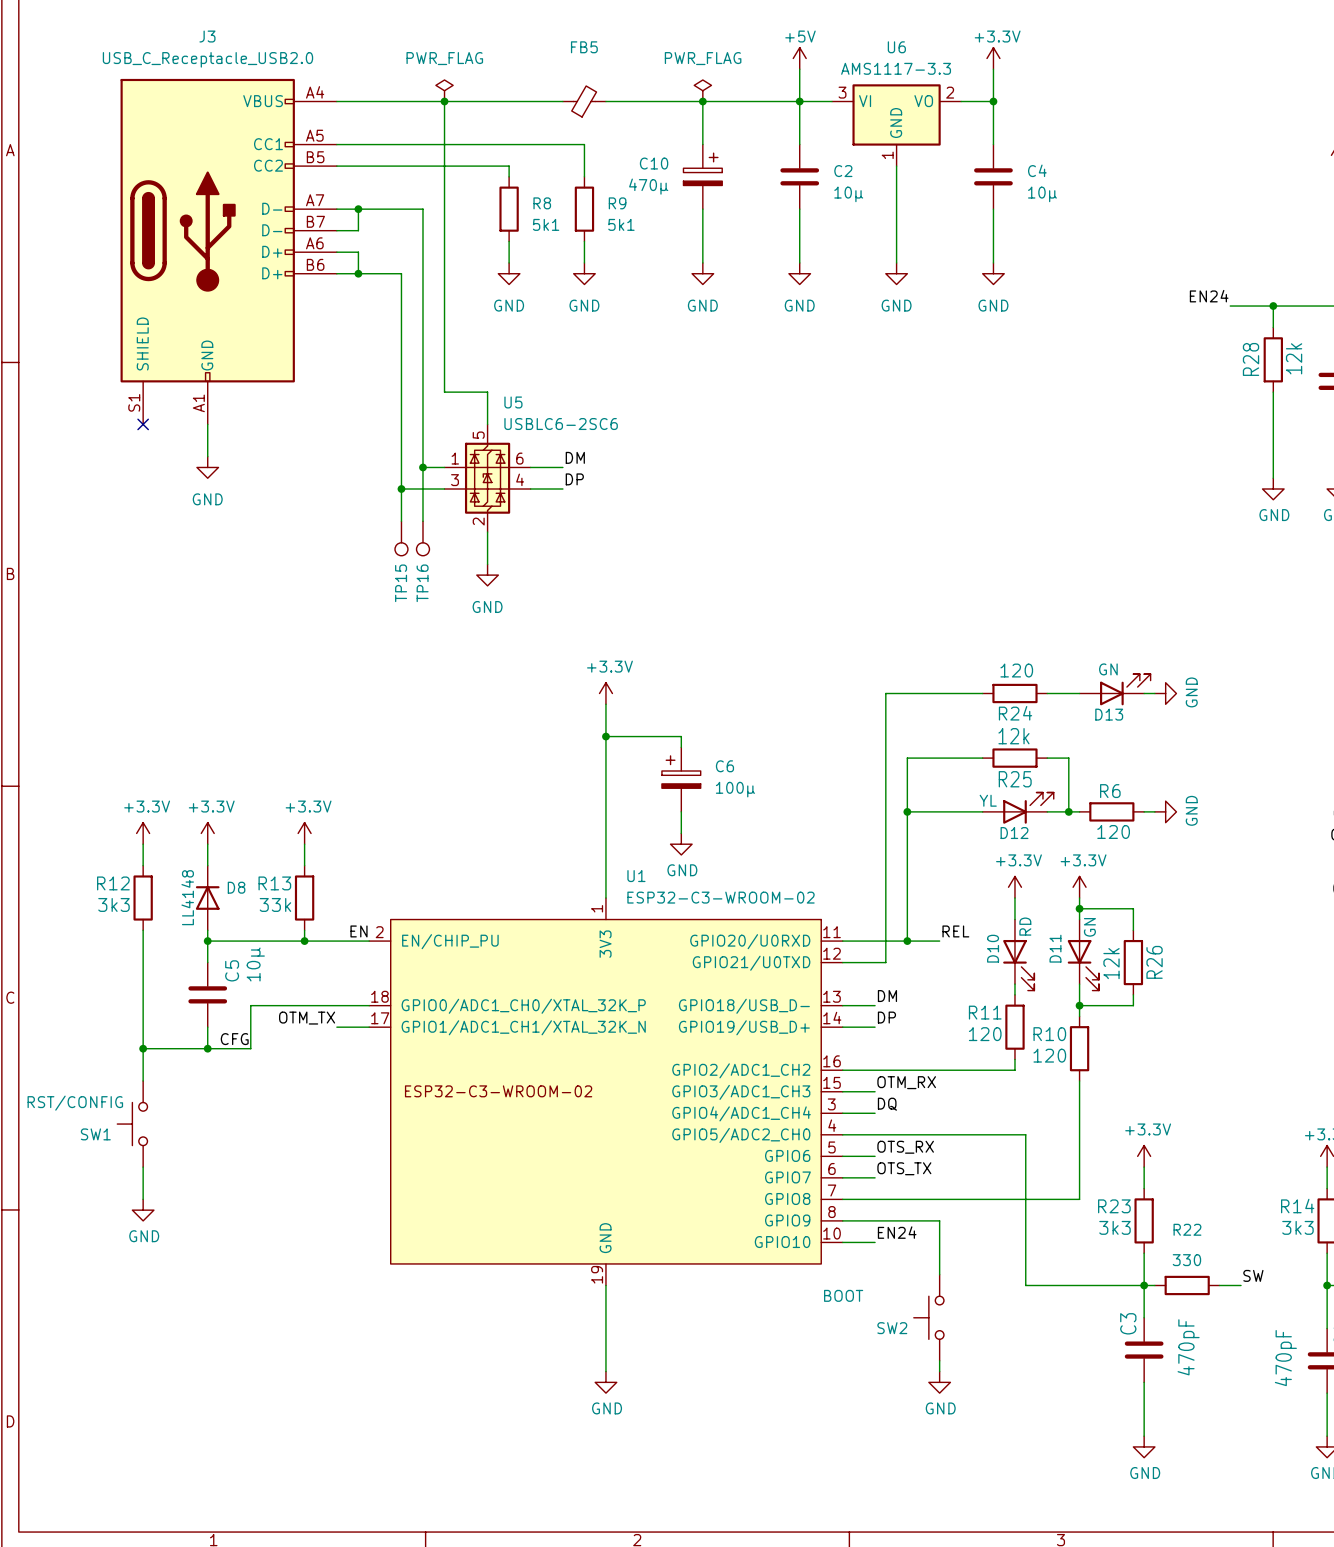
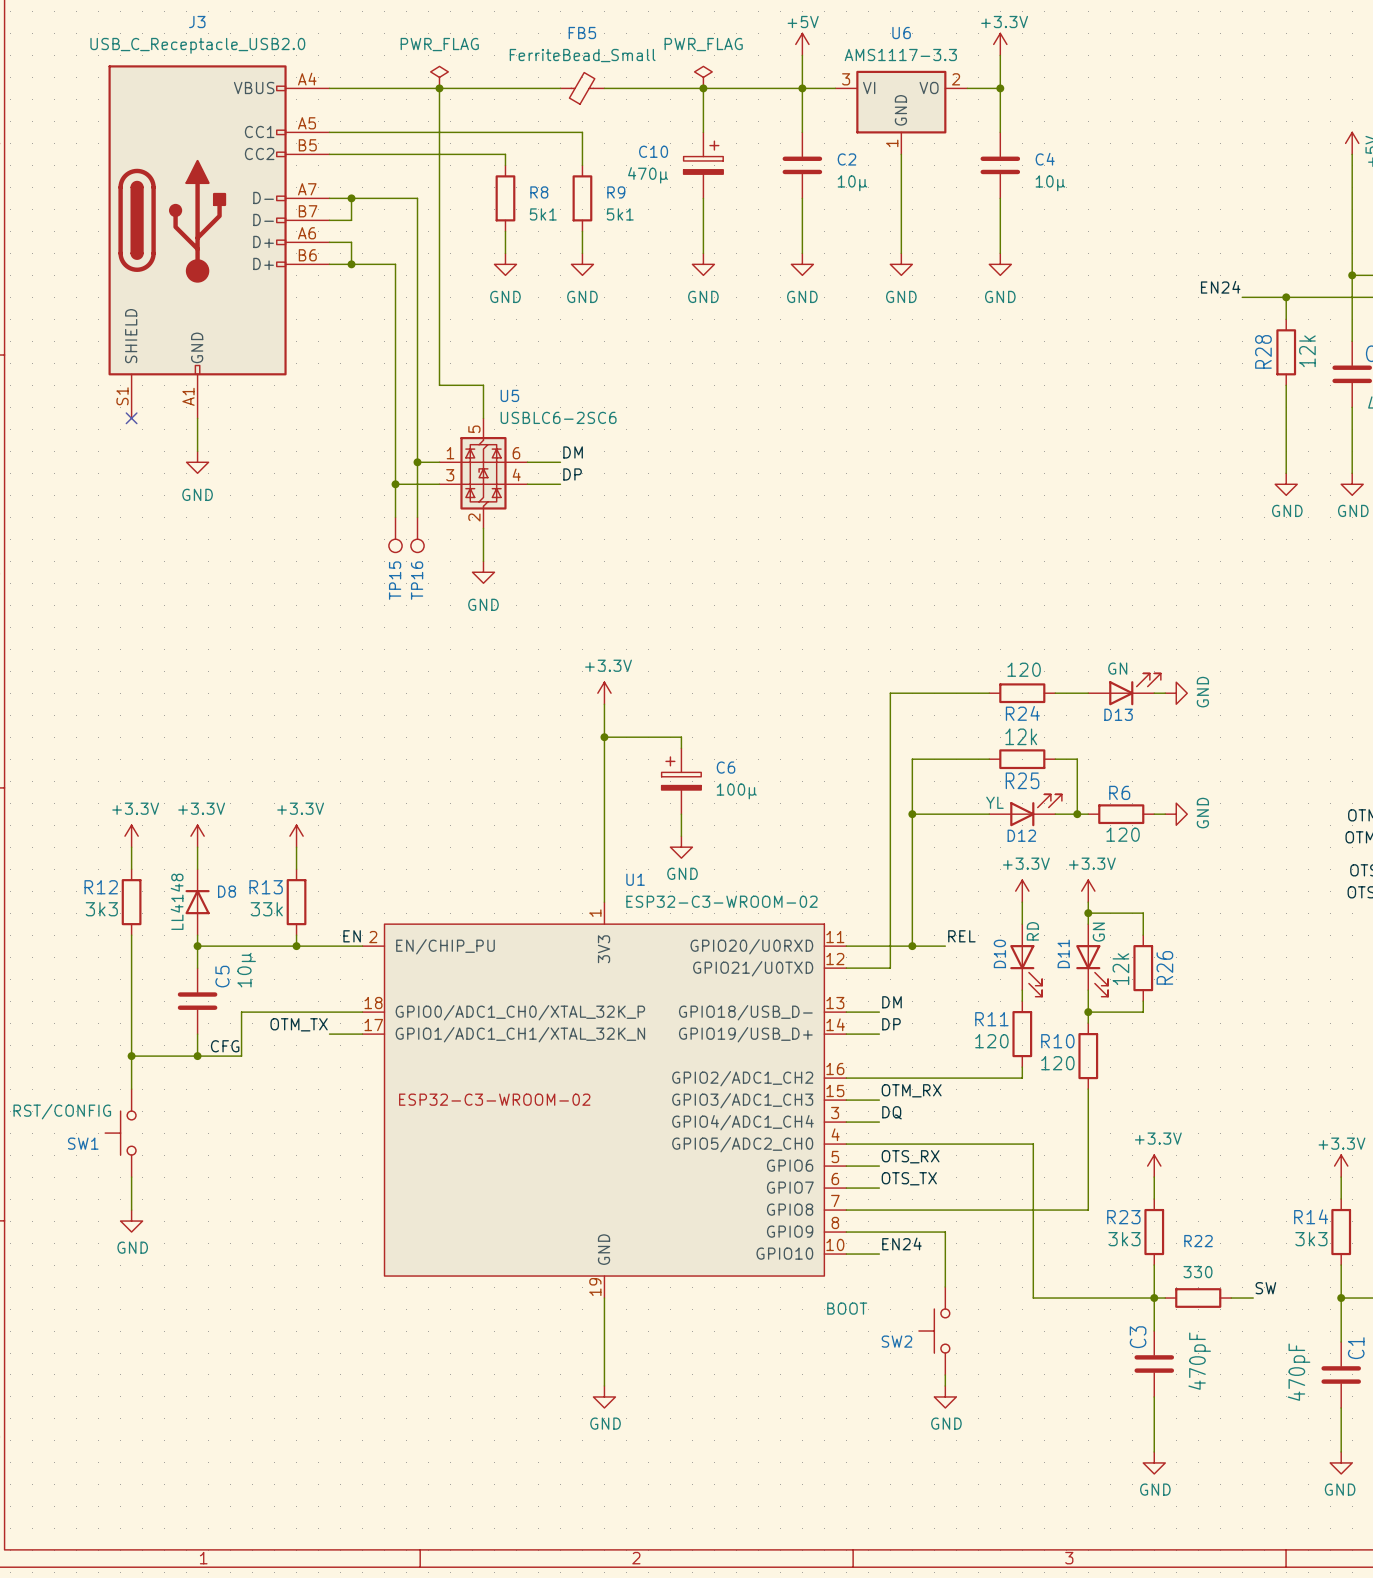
FB5 value: none -> FerriteBead_Small (582, 55)

